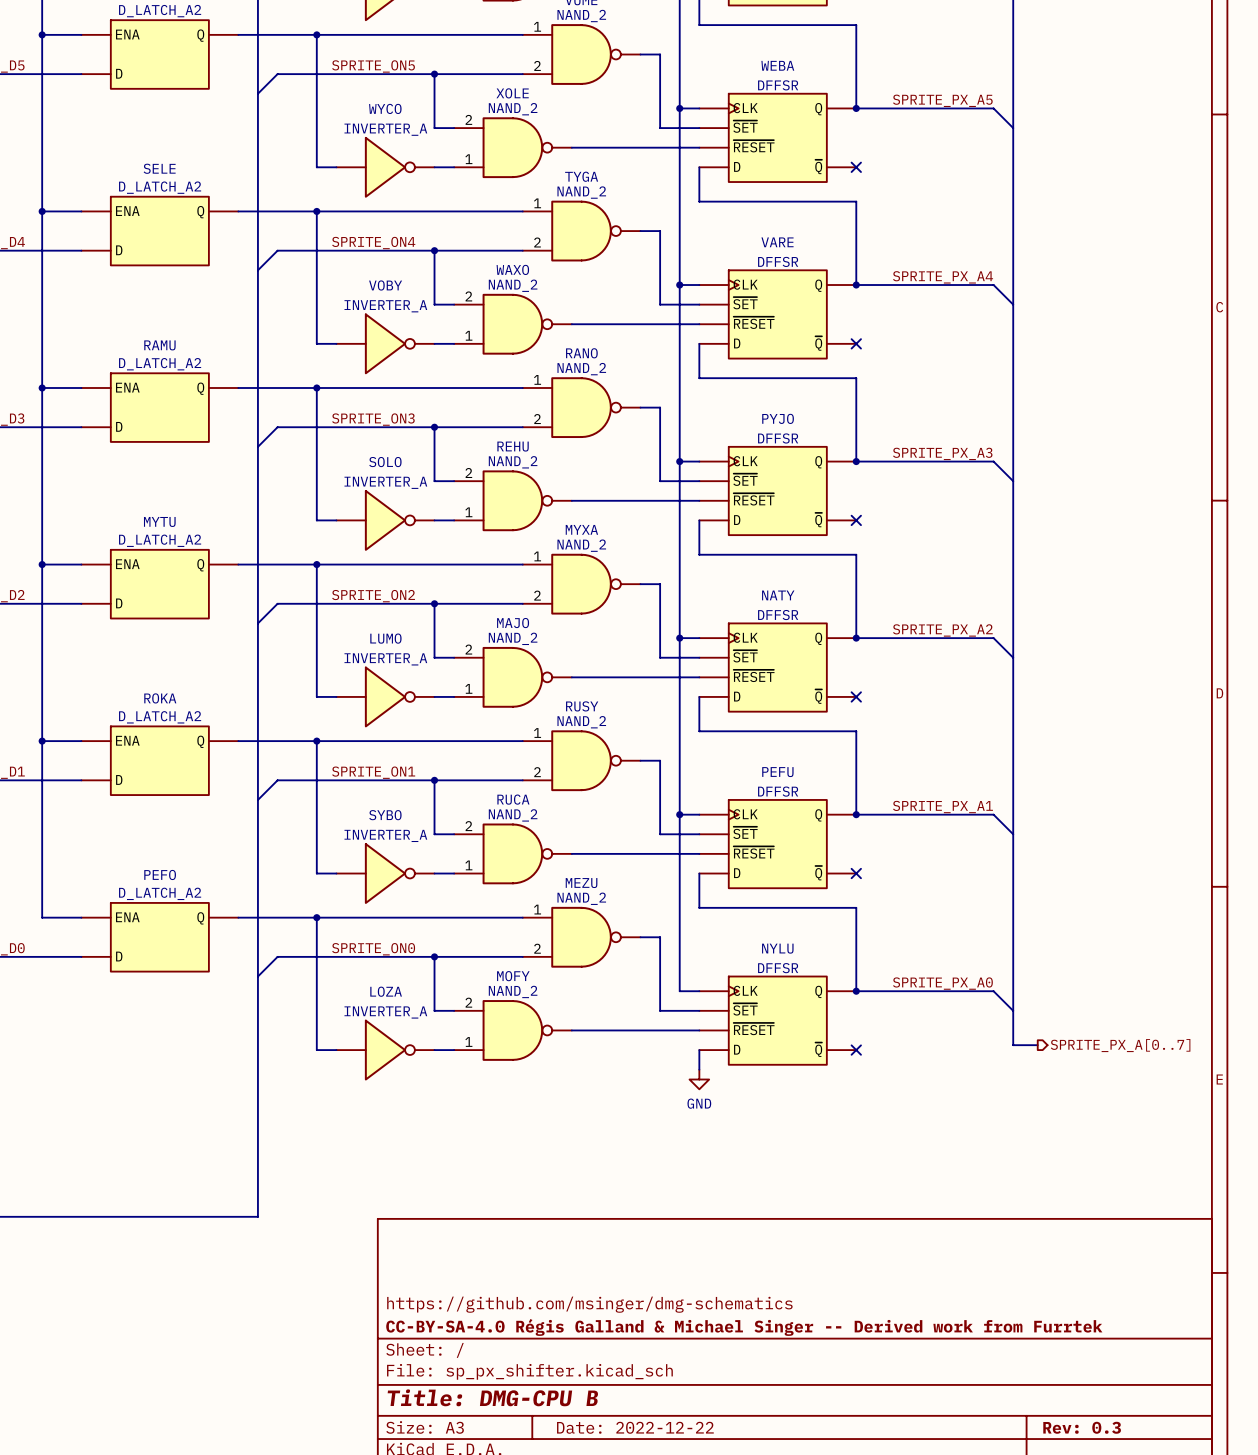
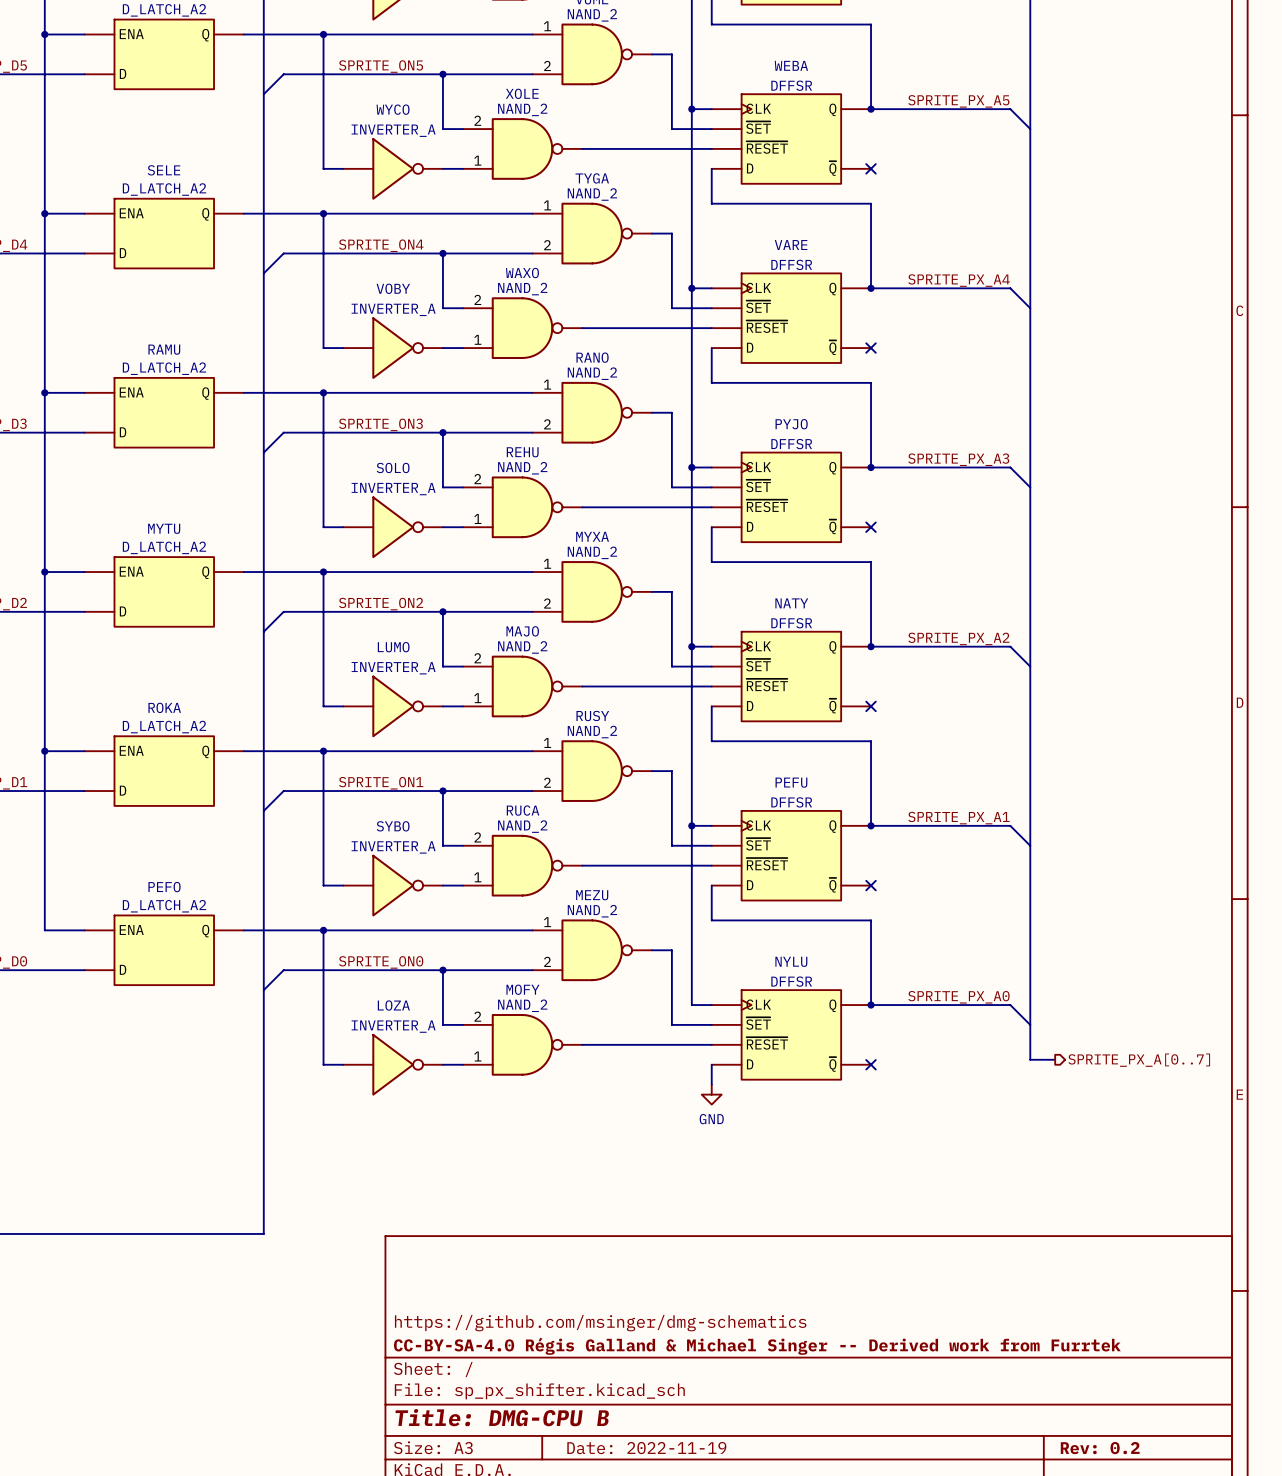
title block: Date: 2022-12-22 (635, 1427) -> Date: 2022-11-19 (646, 1448)
title block: Rev: 0.3 (1082, 1427) -> Rev: 0.2 (1100, 1448)

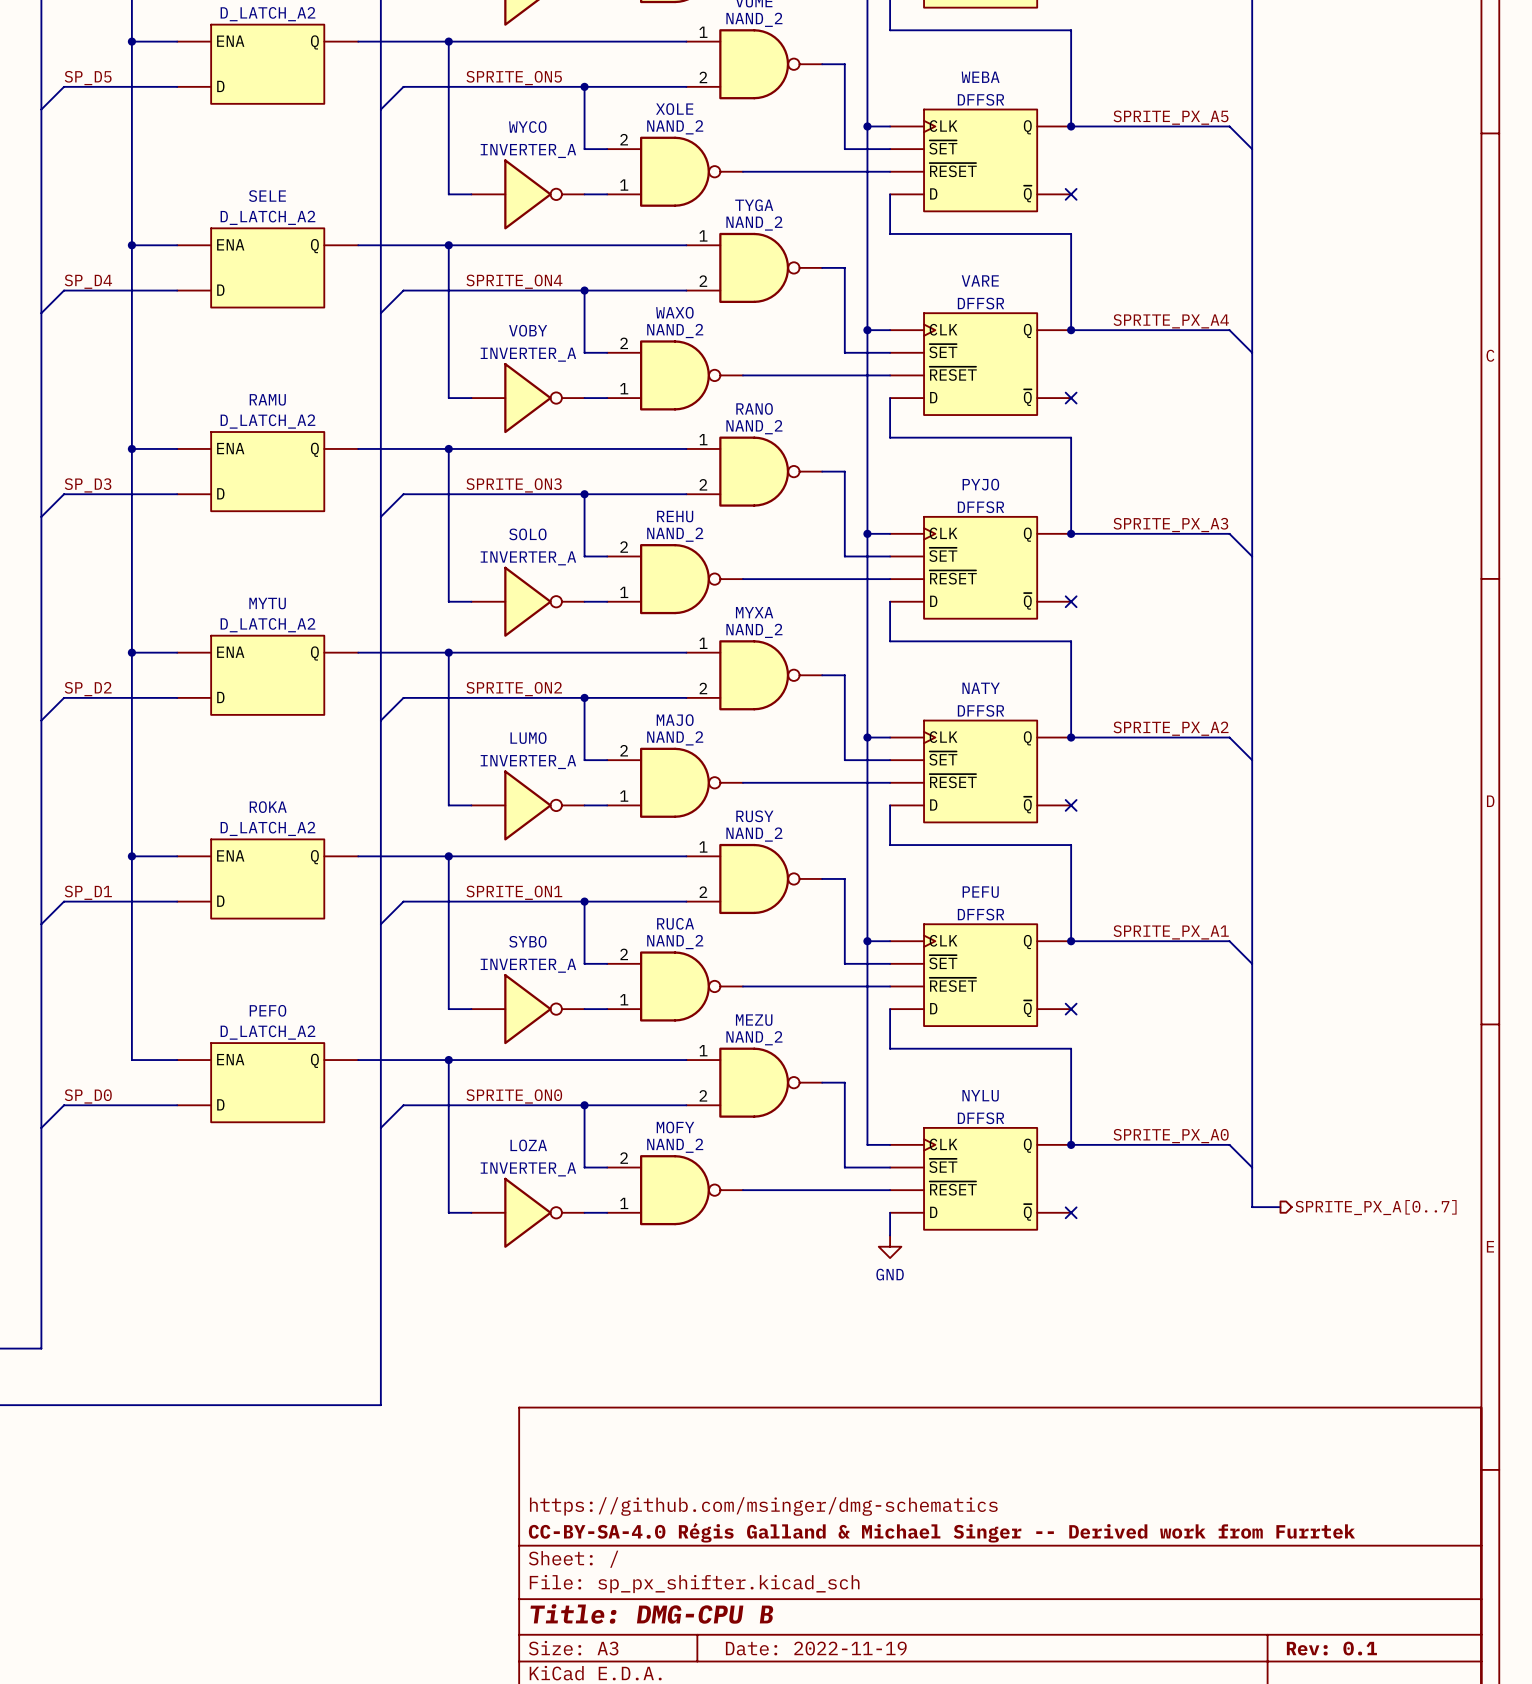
title block: Rev: 0.2 (1100, 1448) -> Rev: 0.1 (1331, 1648)

